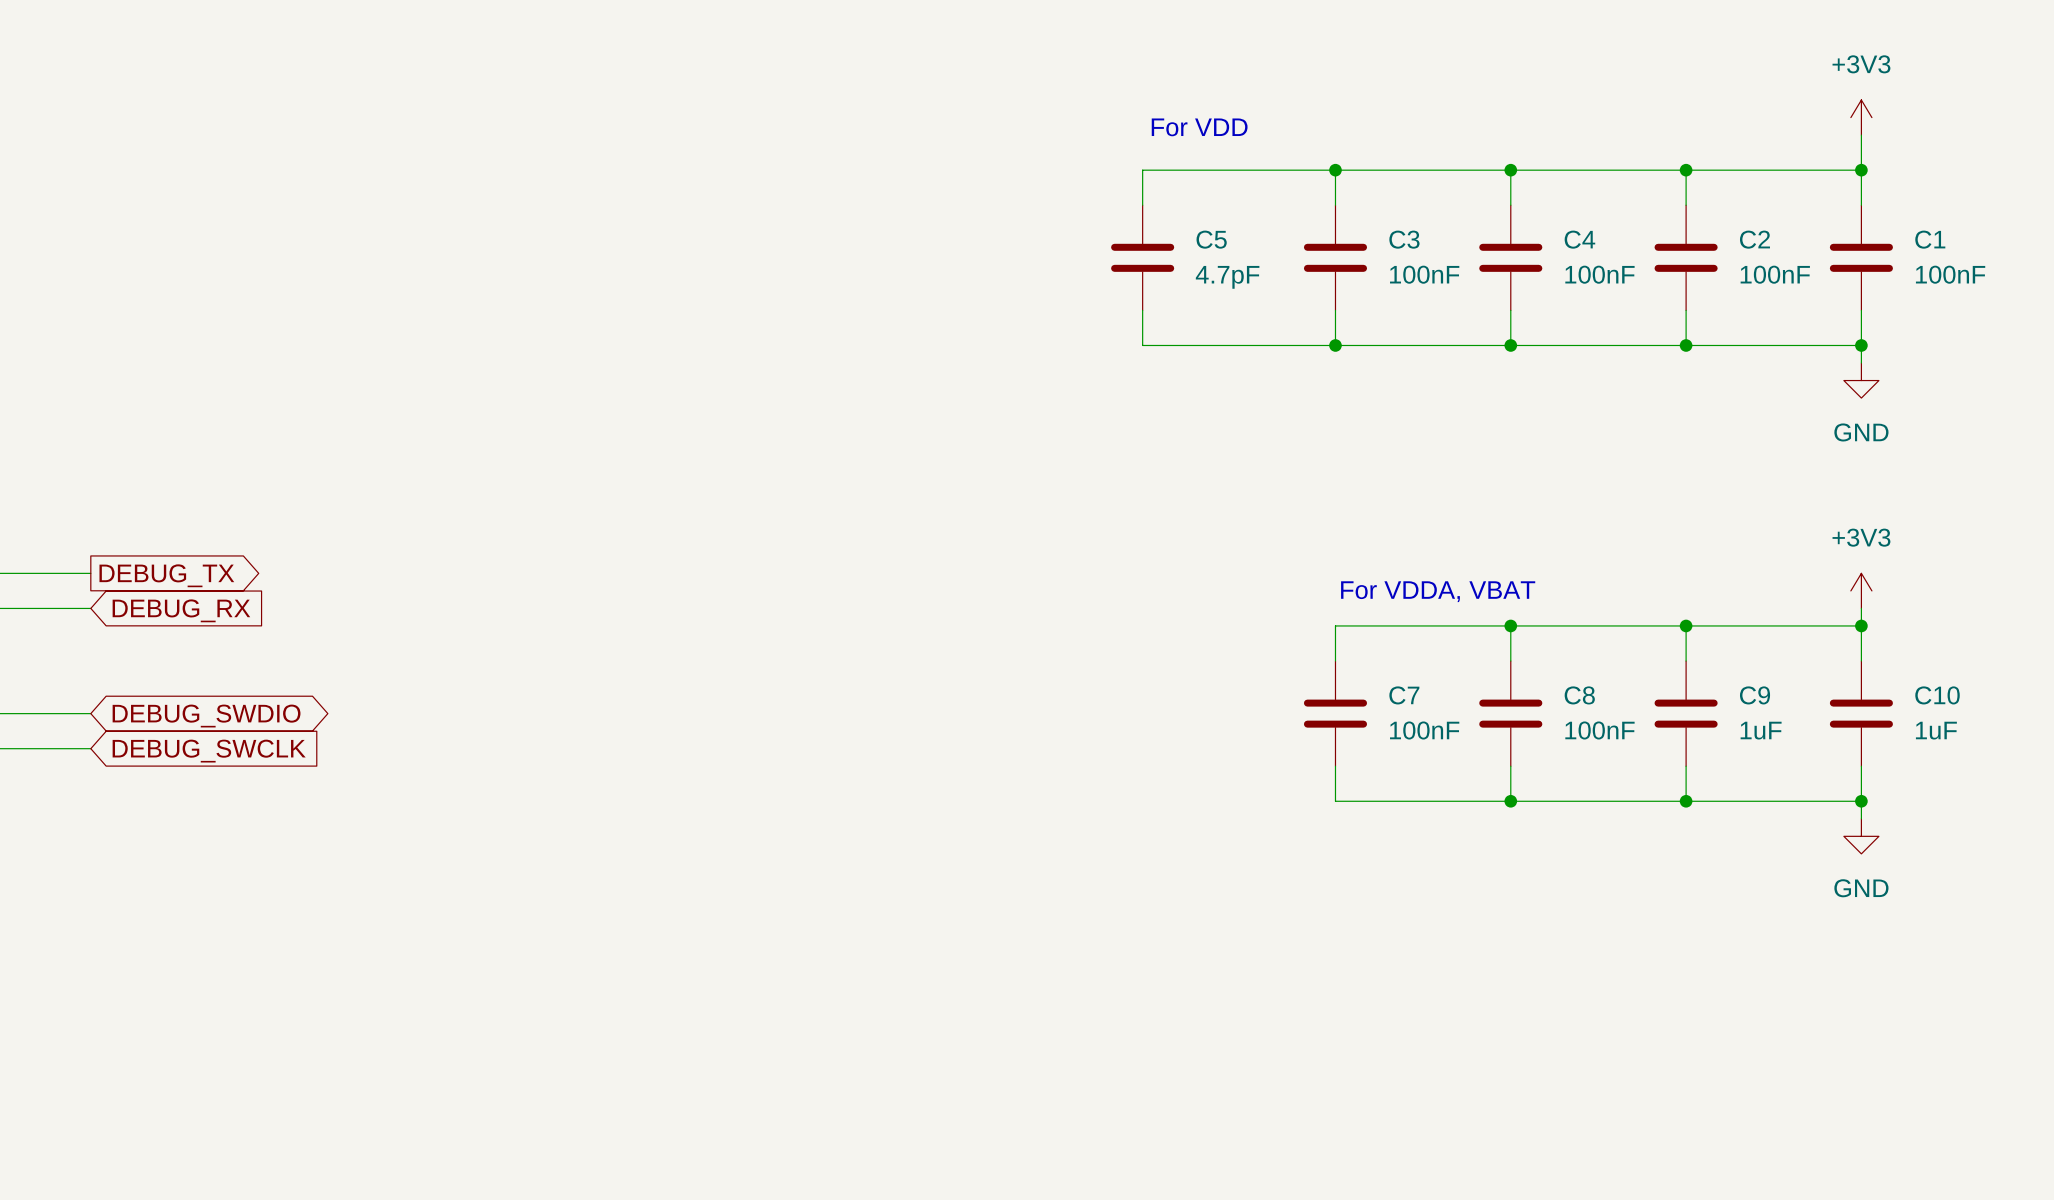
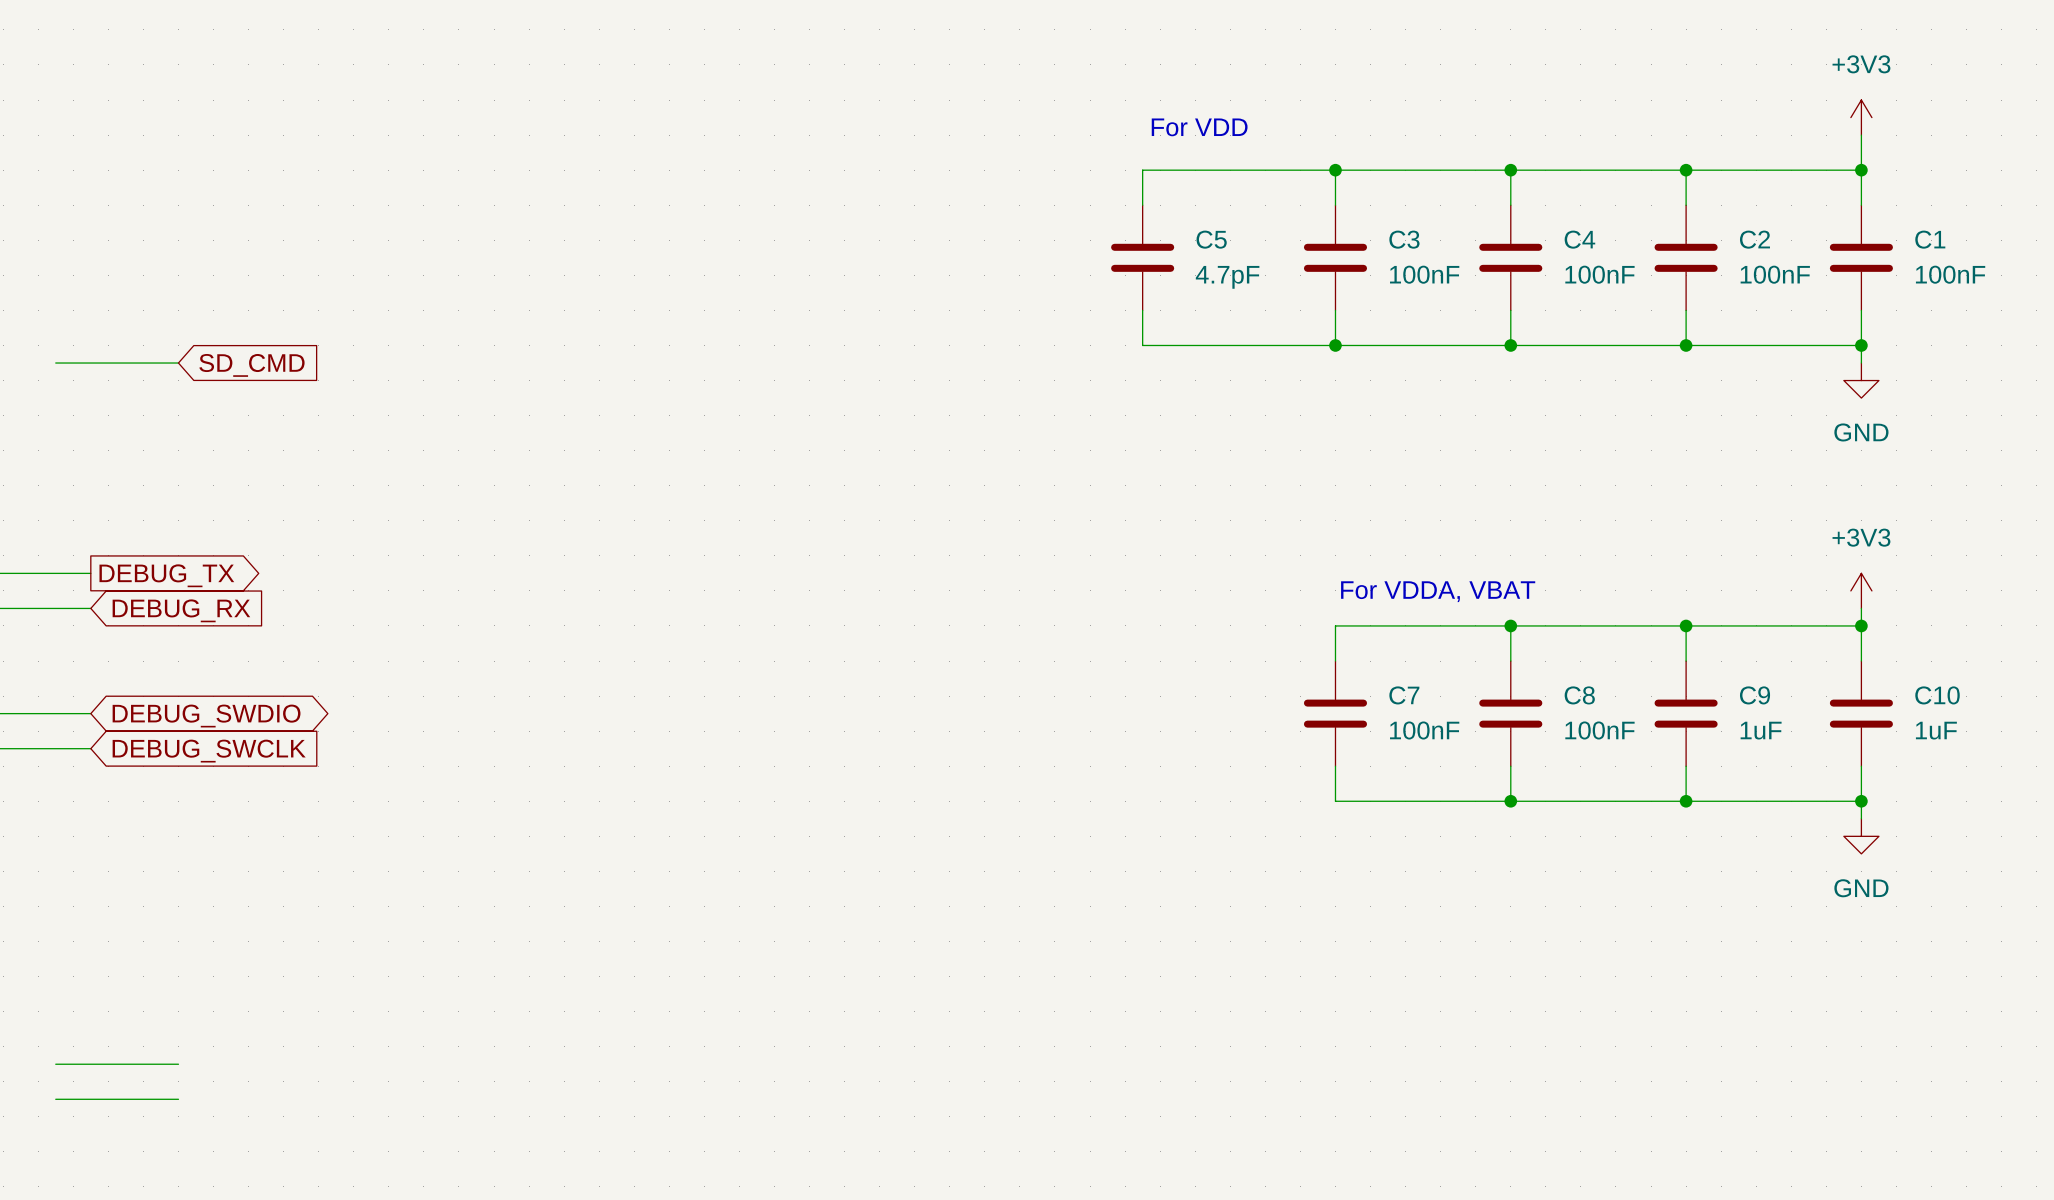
wire: none -> (55, 363) (178, 363)
global label: none -> SD_CMD (251, 365)
wire: none -> (55, 1064) (178, 1064)
wire: none -> (55, 1099) (178, 1099)

